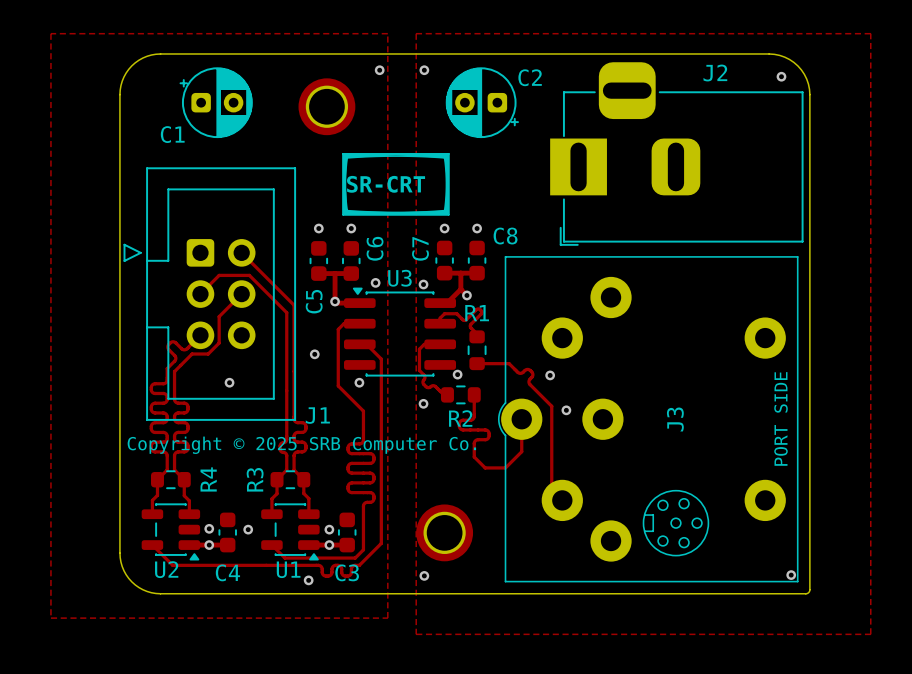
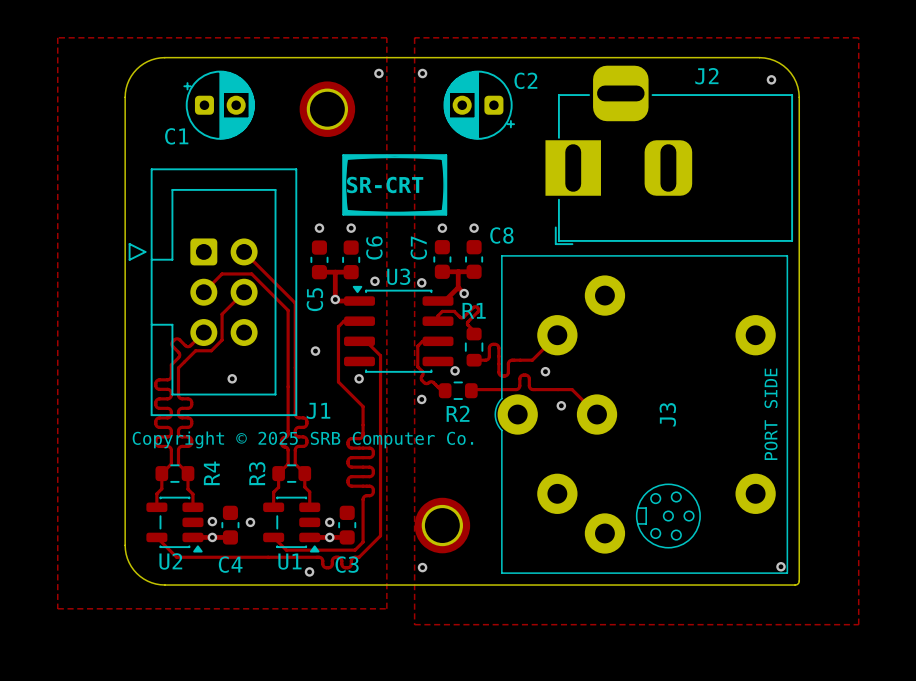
track: (488, 363) (509, 363) (520, 373) (529, 370) (532, 374) (529, 383) (551, 406) (551, 489) (562, 500) -> (485, 360) (489, 357) (490, 345) (497, 345) (498, 373) (501, 375) (505, 375) (508, 373) (509, 361) (532, 360) (557, 335)
track: (474, 394) (473, 418) (461, 420) (459, 426) (462, 429) (485, 429) (488, 431) (487, 438) (476, 439) (474, 443) (474, 456) (485, 467) (505, 467) (521, 451) (521, 419) -> (471, 390) (516, 389) (519, 386) (520, 376) (526, 375) (529, 377) (531, 389) (572, 389) (597, 414)

